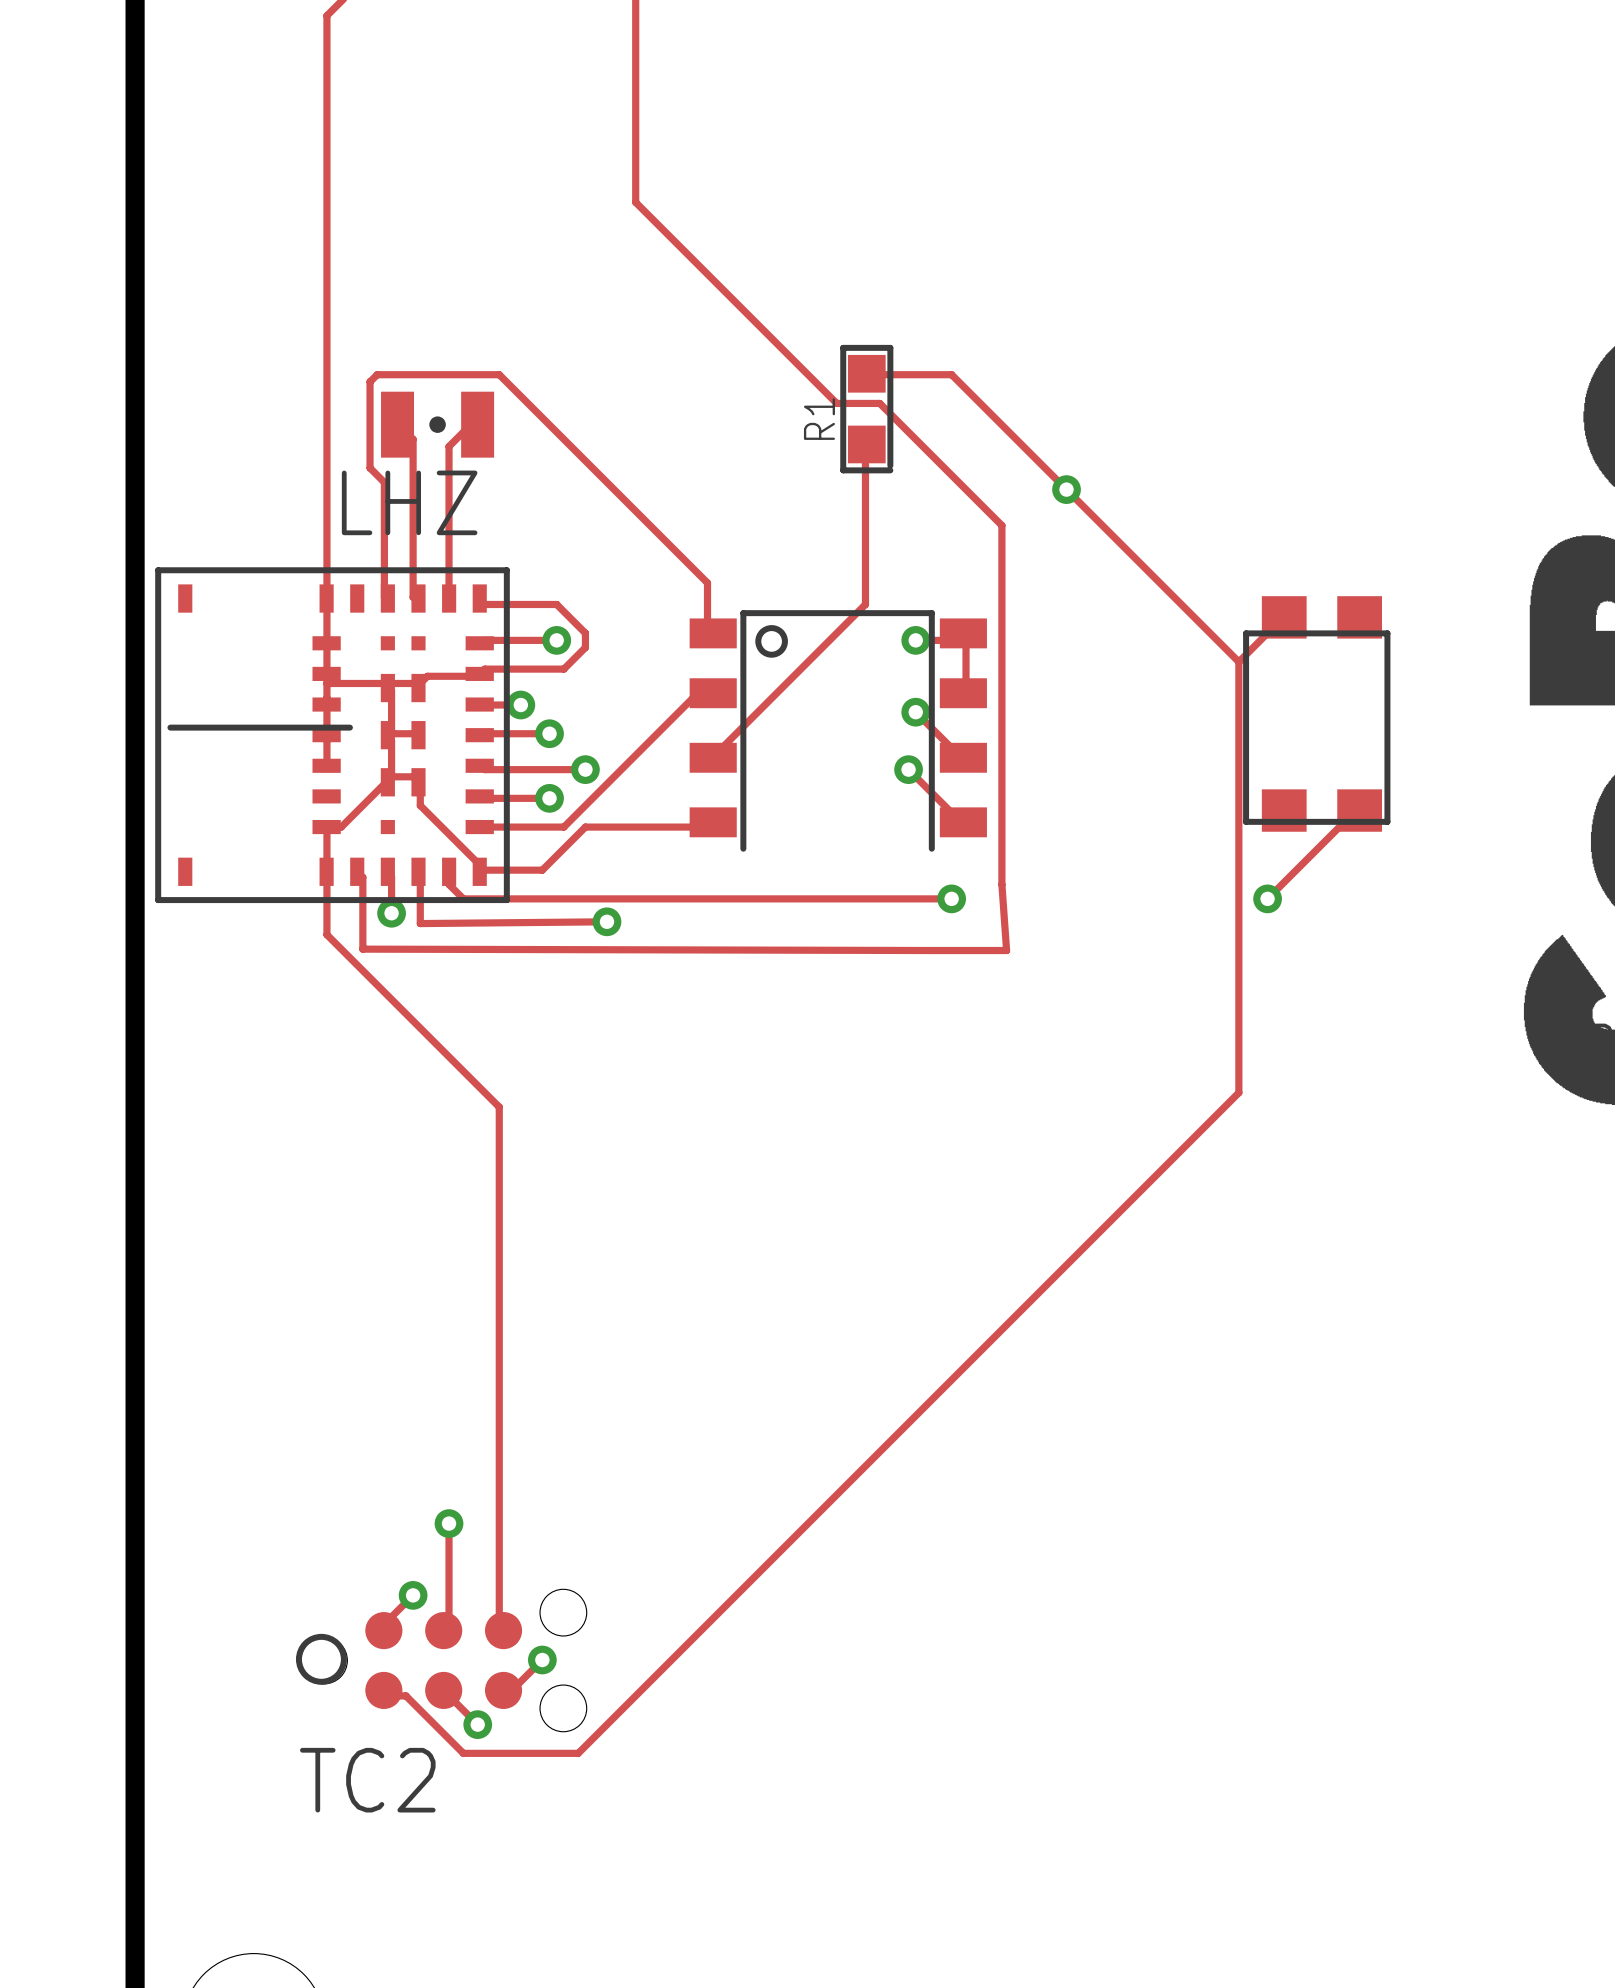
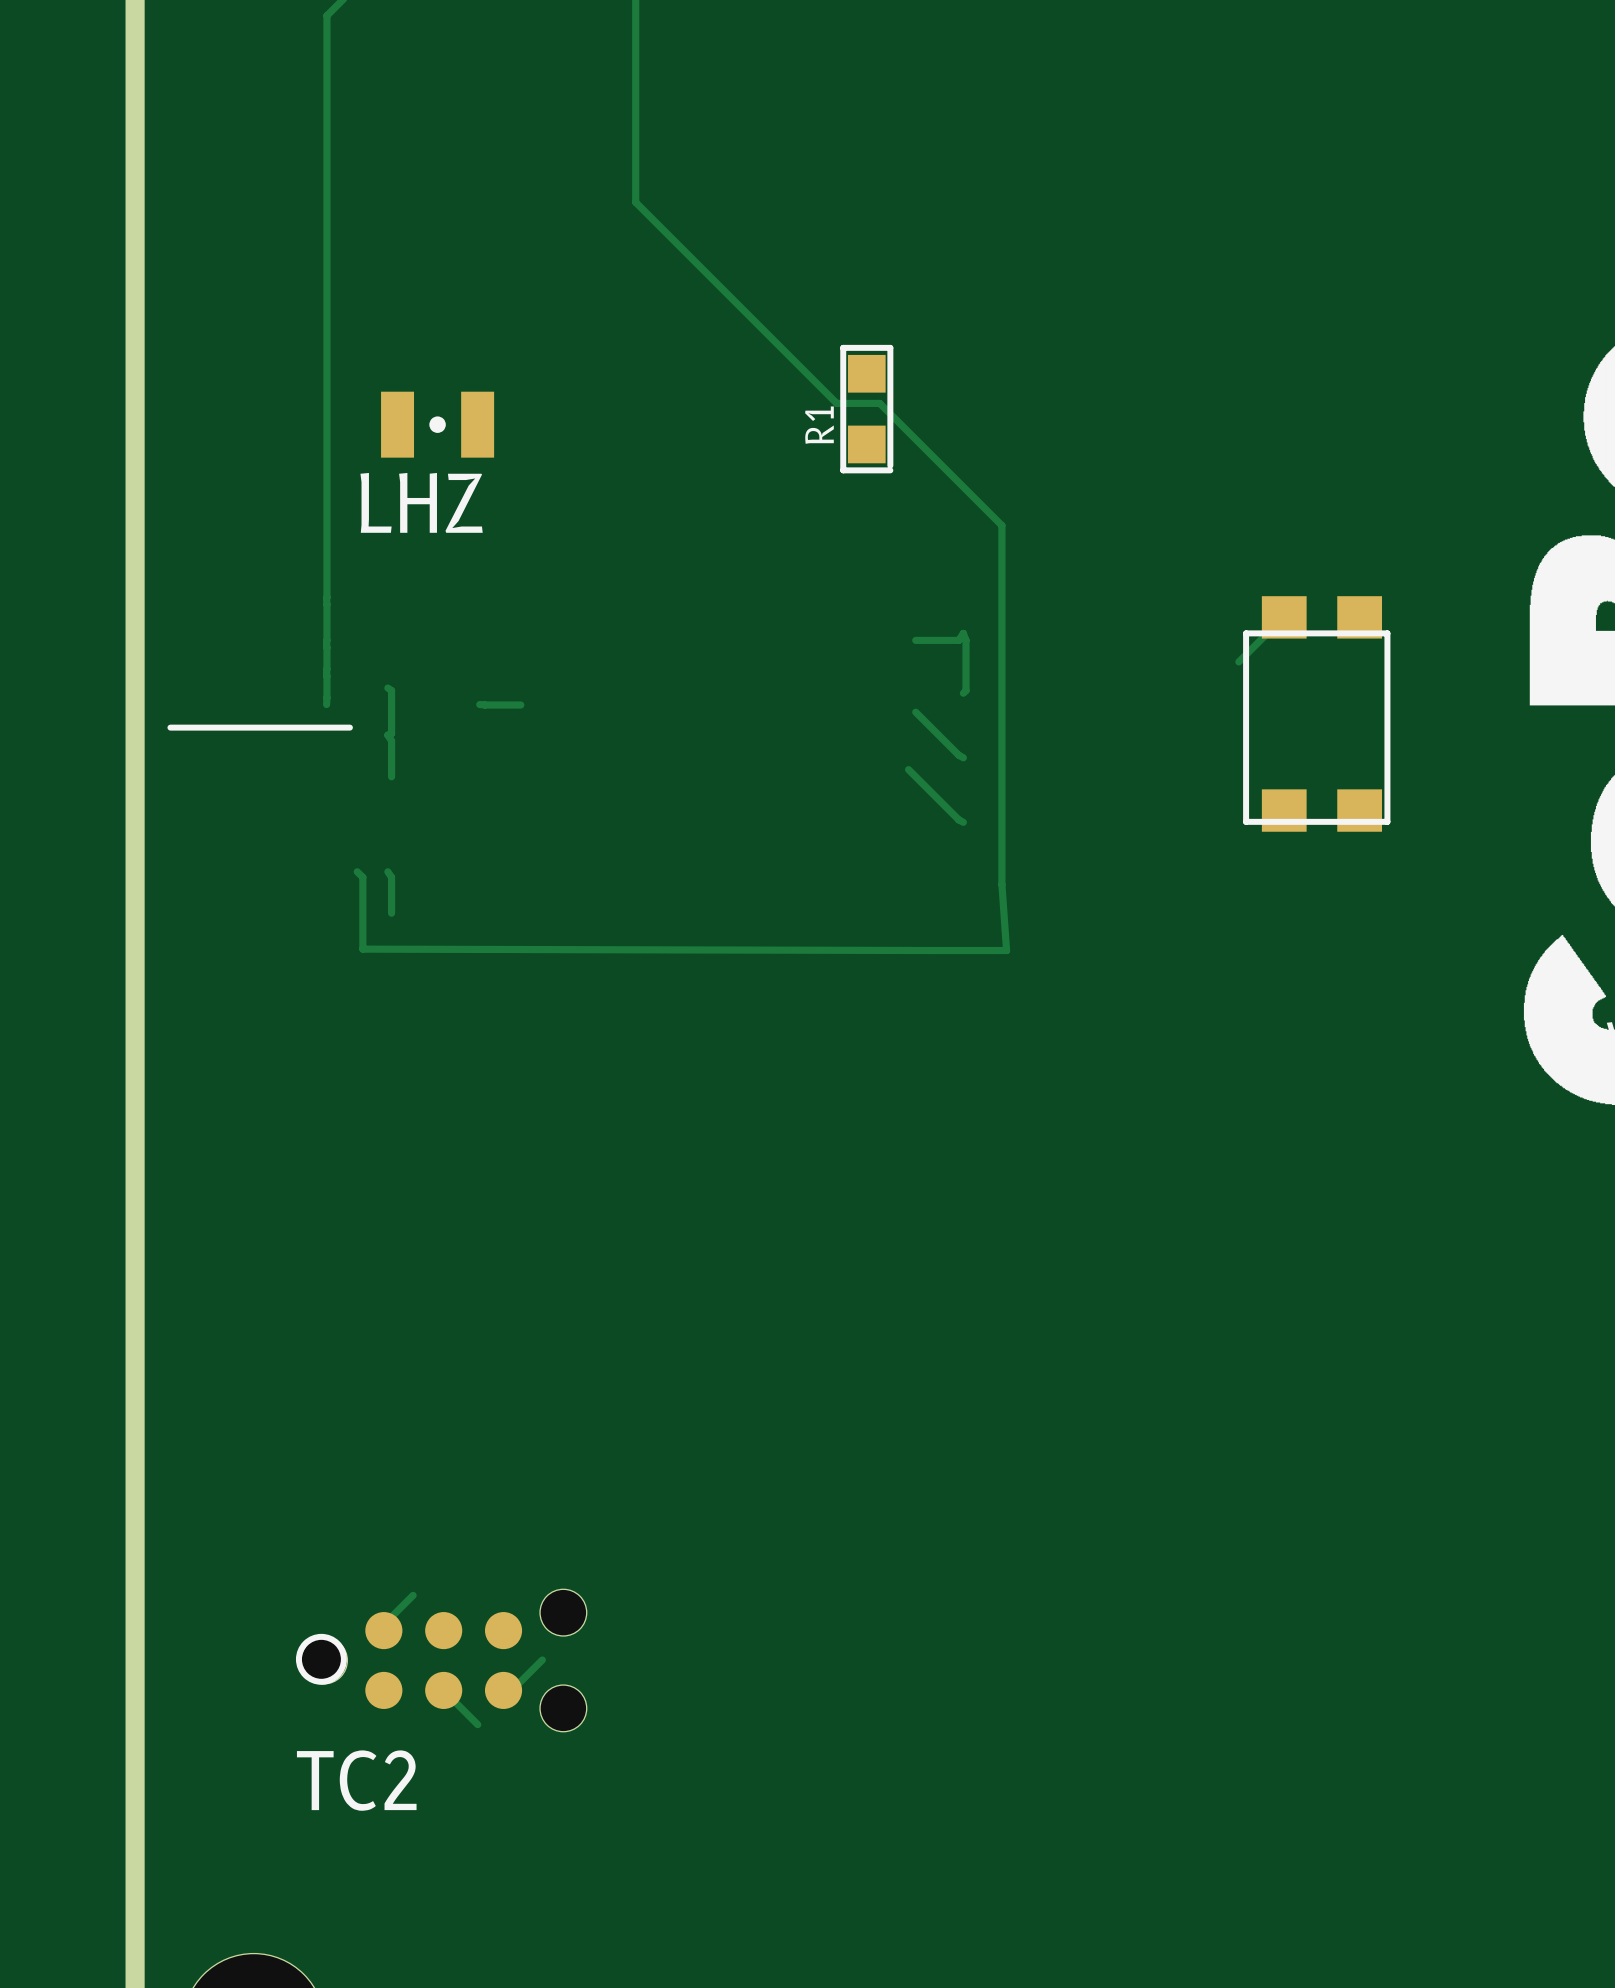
track: (866, 373) (951, 374) (1238, 661) (1238, 1092) (578, 1753) (463, 1753) (405, 1695) (384, 1695) (383, 1690) -> none
track: (397, 424) (413, 439) (413, 597) (418, 598) -> none
track: (477, 424) (470, 424) (449, 446) (449, 598) -> none
track: (866, 444) (865, 604) (713, 757) -> none
via: (1066, 489) -> none
track: (387, 598) (384, 597) (384, 482) (370, 468) (370, 381) (377, 374) (499, 374) (707, 582) (707, 633) (713, 633) -> none
track: (479, 598) (484, 604) (556, 604) (585, 633) (585, 647) (563, 669) (484, 669) (477, 676) (427, 676) (418, 688) (413, 683) (391, 683) (387, 688) (384, 683) (326, 683) -> none
track: (556, 640) (484, 640) (479, 643) -> none
via: (556, 640) -> none
via: (915, 640) -> none
track: (713, 693) (707, 697) (693, 697) (563, 827) (479, 827) -> none
track: (326, 705) (326, 765) -> none
via: (520, 705) -> none
via: (915, 712) -> none
part: (838, 730) -> none
track: (391, 733) (418, 735) -> none
track: (549, 733) (479, 735) -> none
via: (549, 733) -> none
part: (332, 735) -> none
track: (479, 765) (484, 769) (585, 769) -> none
via: (585, 769) -> none
via: (908, 769) -> none
track: (479, 796) (484, 798) (549, 798) -> none
via: (549, 798) -> none
track: (1359, 810) (1353, 812) (1267, 898) -> none
track: (713, 822) (707, 827) (585, 827) (542, 870) (484, 870) (479, 871) (477, 870) (477, 862) (420, 805) (420, 783) (413, 776) (391, 776) (341, 827) (326, 827) (326, 934) (499, 1107) (499, 1624) (503, 1630) -> none
track: (418, 871) (420, 877) (420, 923) (606, 921) -> none
track: (449, 871) (449, 884) (463, 898) (951, 898) -> none
via: (951, 898) -> none
via: (1267, 898) -> none
via: (391, 913) -> none
via: (606, 921) -> none
track: (449, 1523) (449, 1624) (443, 1630) -> none
via: (449, 1523) -> none
via: (413, 1595) -> none
via: (542, 1660) -> none
via: (477, 1724) -> none

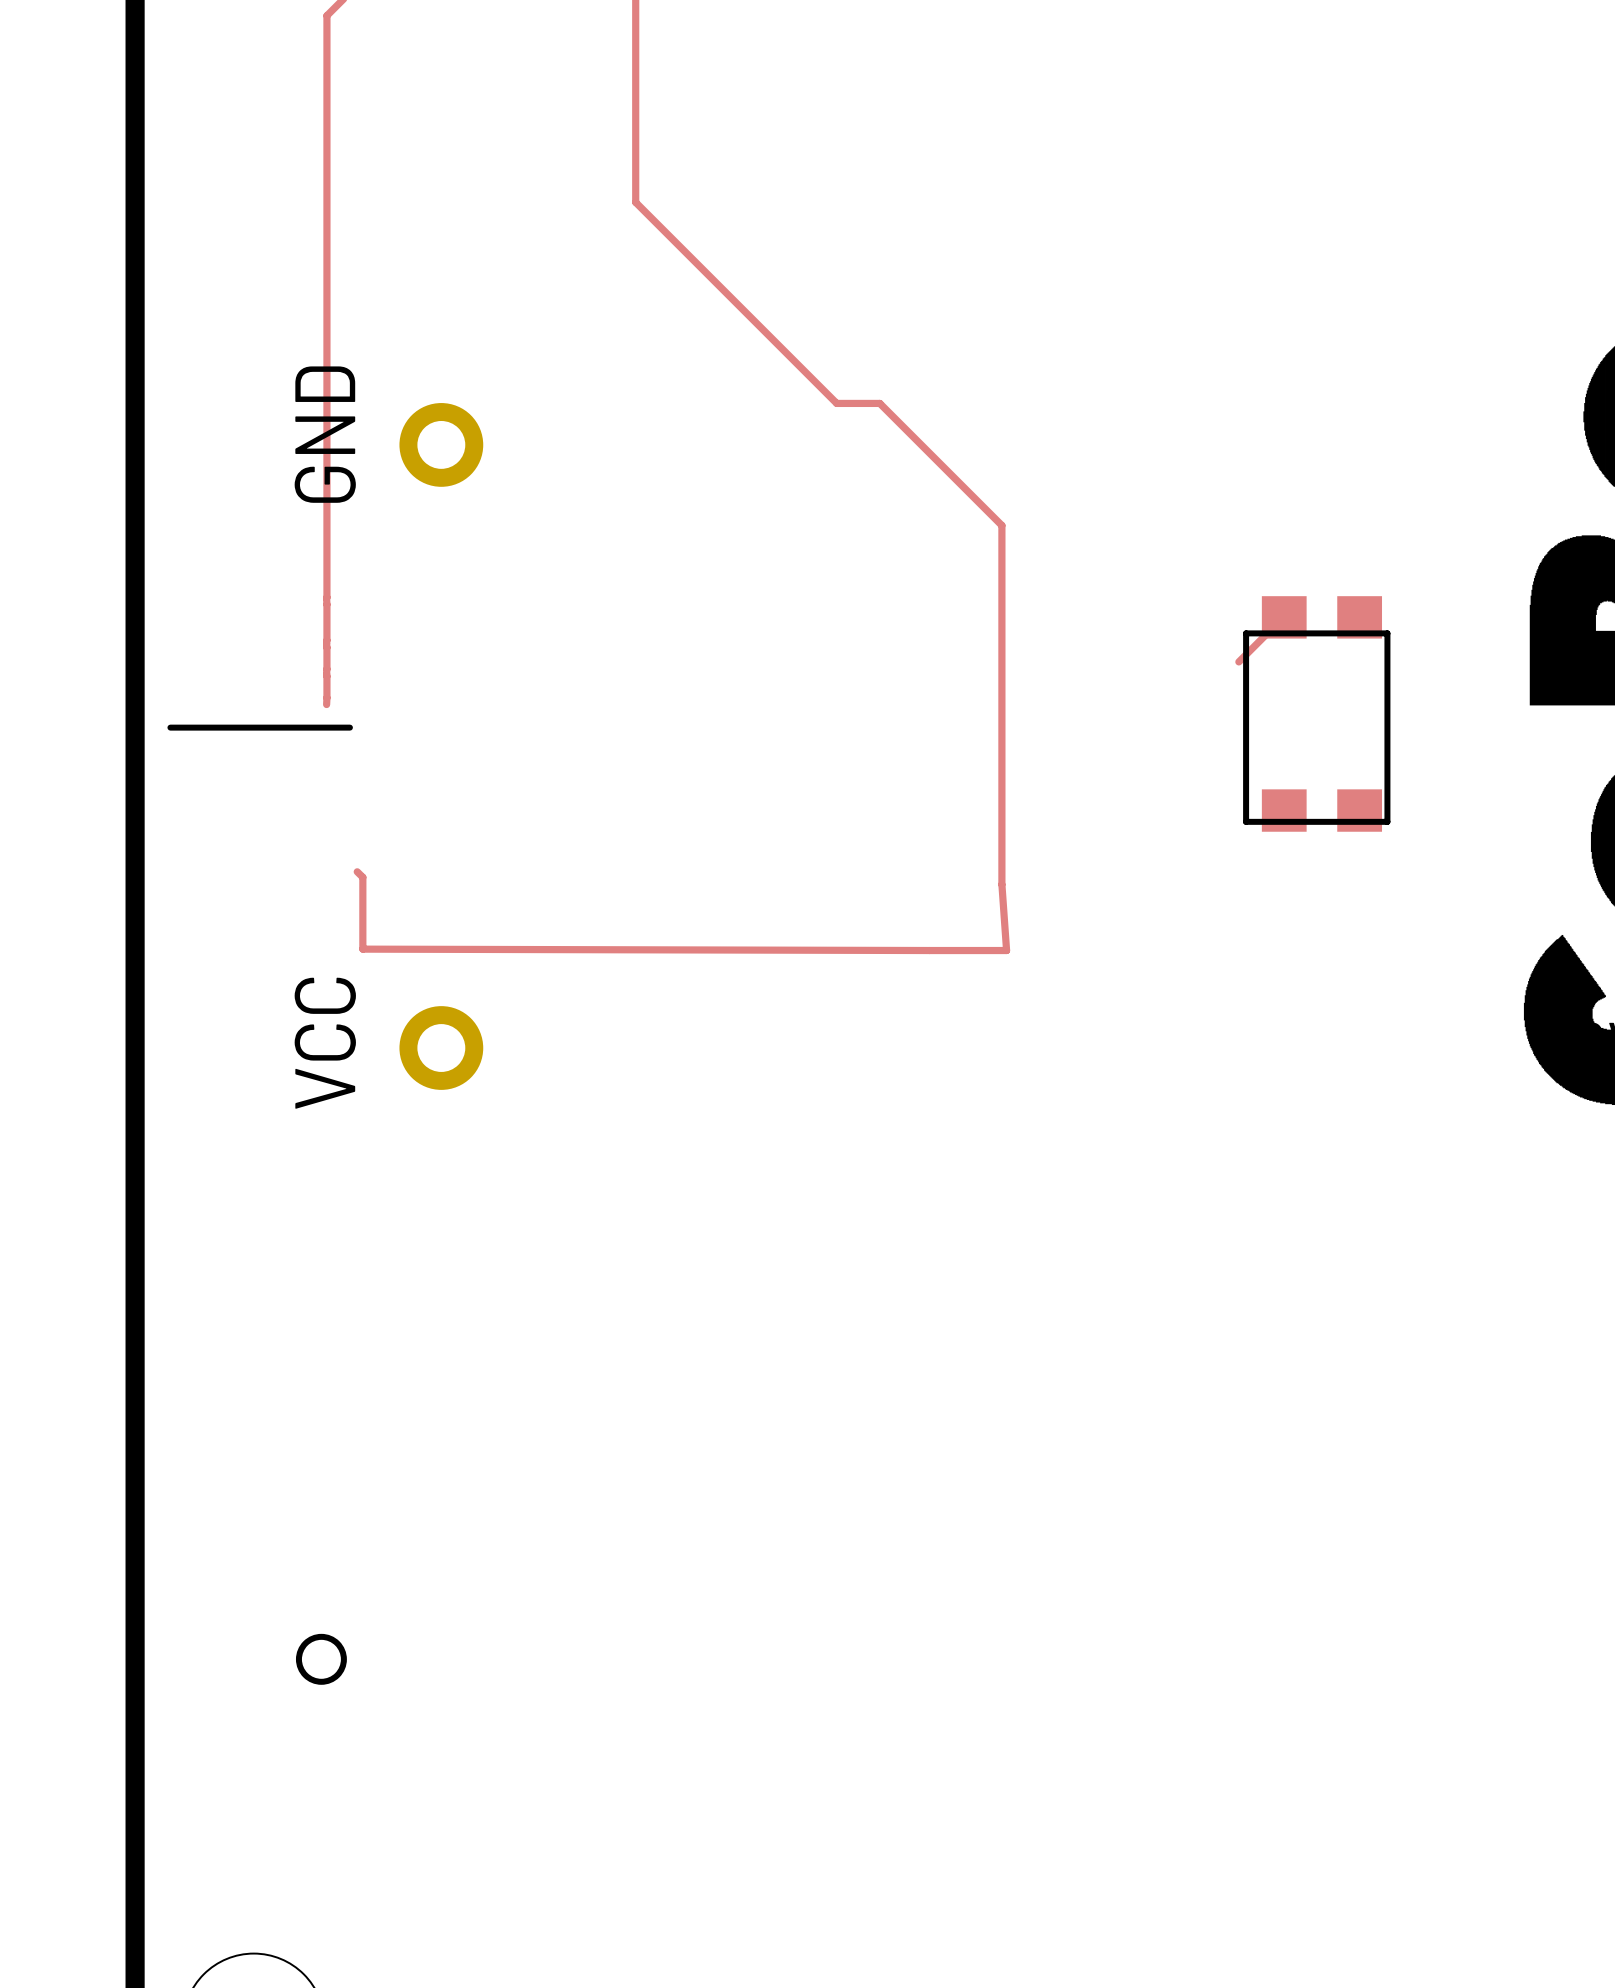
R1: (866, 409) -> none
LHZ: (437, 424) -> none
GND: none -> (441, 444)
track: (915, 640) (958, 640) (963, 633) (966, 640) (966, 690) (963, 693) -> none
track: (387, 688) (391, 690) (391, 733) (387, 735) (391, 740) (391, 776) -> none
track: (479, 704) (520, 705) -> none
track: (915, 712) (963, 757) -> none
track: (908, 769) (963, 822) -> none
track: (387, 871) (391, 877) (391, 913) -> none
VCC: none -> (441, 1048)
track: (413, 1595) (384, 1624) (383, 1630) -> none
TC2: (443, 1660) -> none
track: (542, 1660) (506, 1695) (503, 1690) -> none
track: (443, 1690) (477, 1724) -> none

